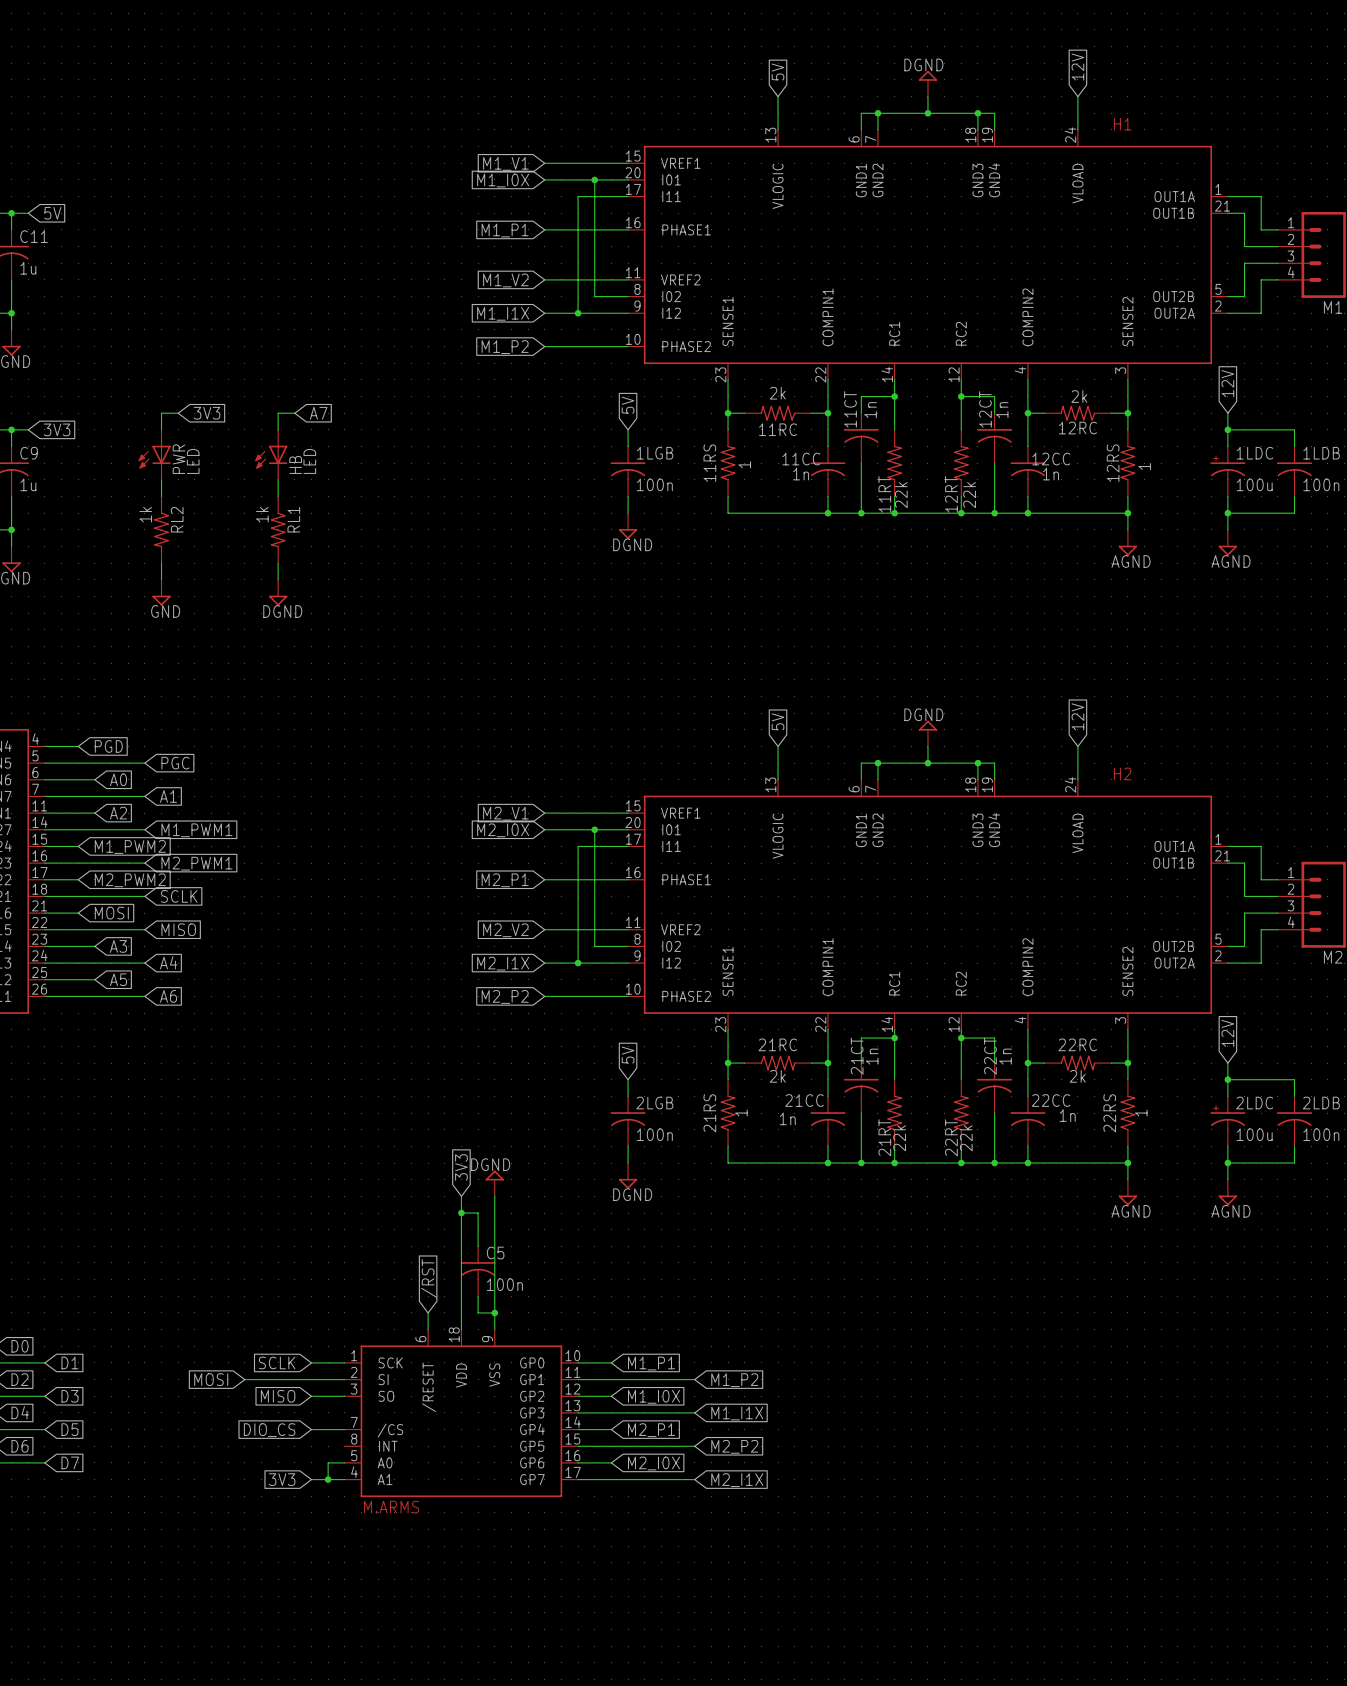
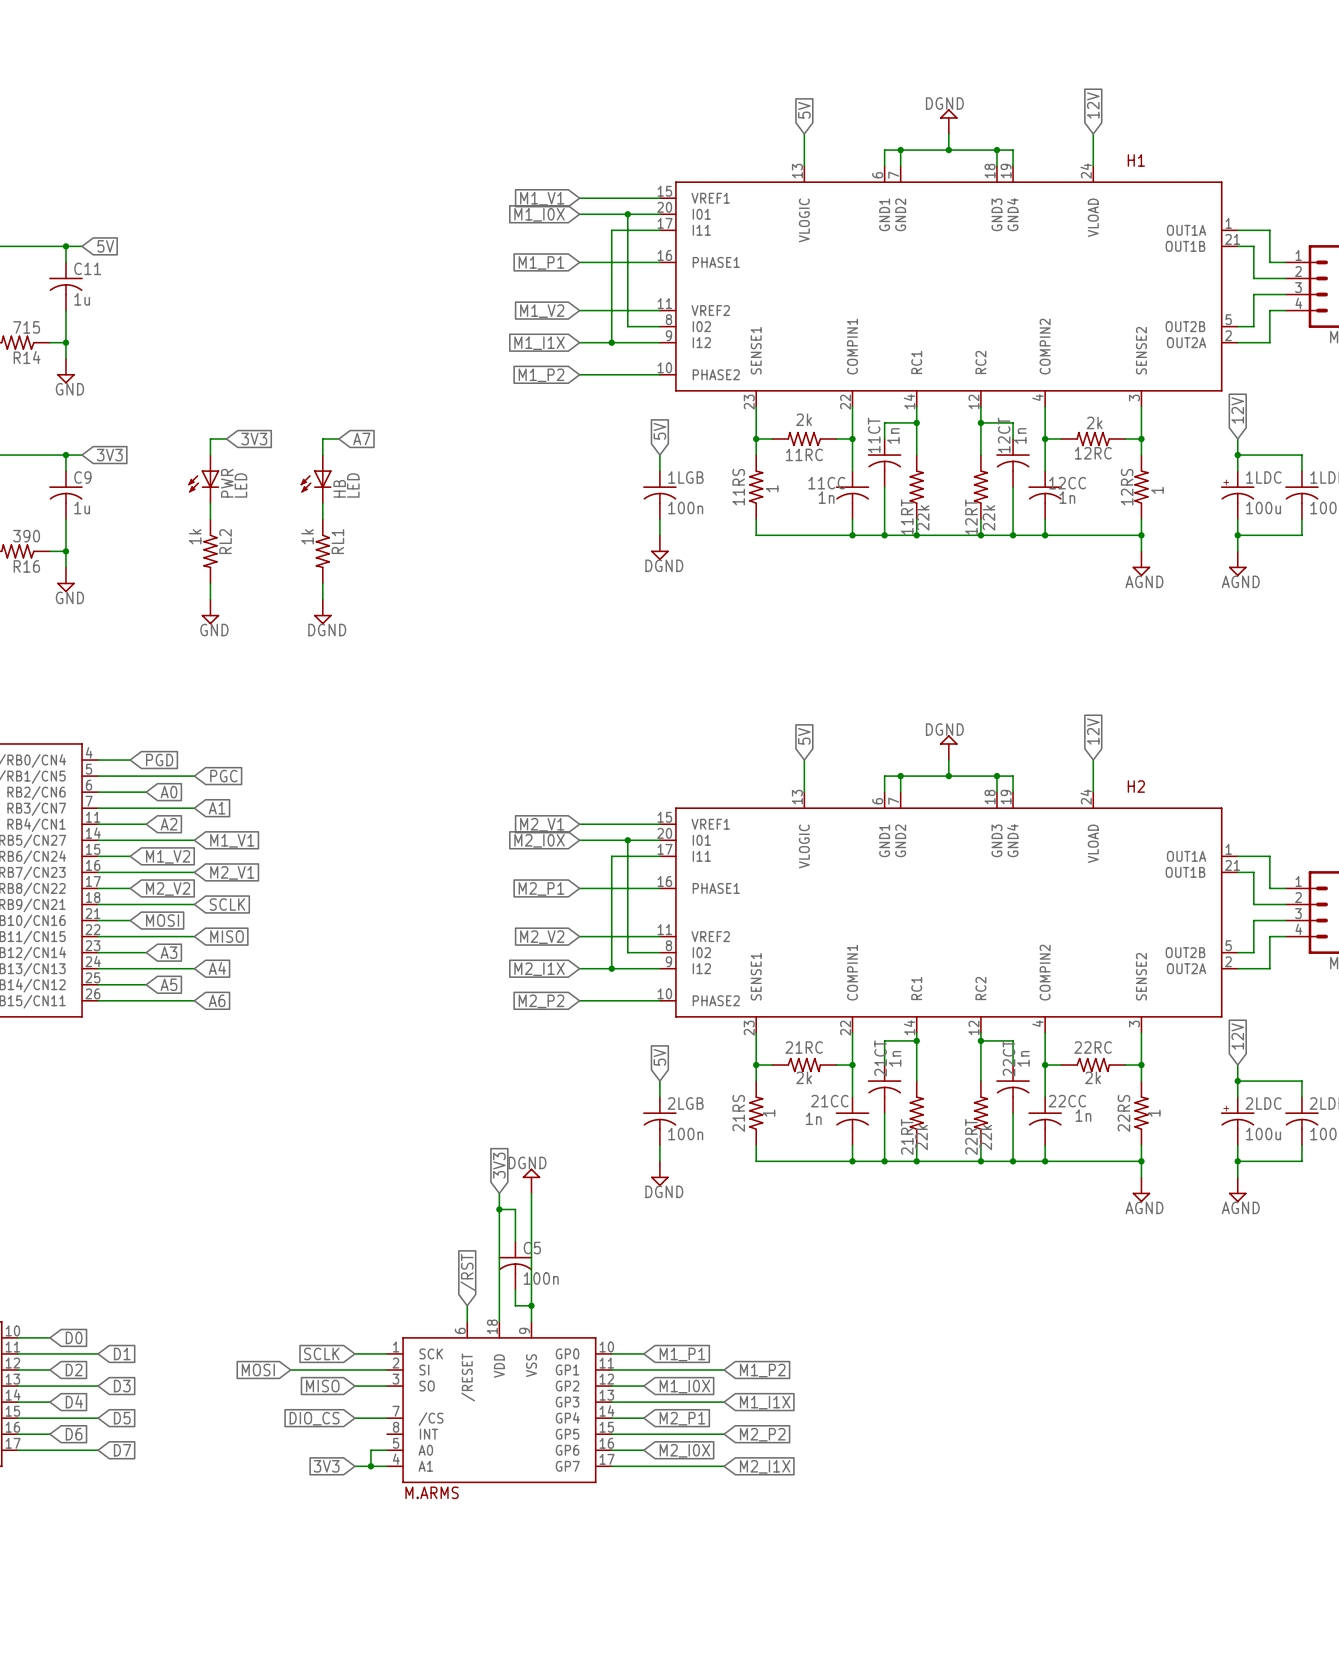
global label: M1_PWM1 (196, 830) -> M1_V1 (232, 840)
global label: M1_PWM2 (130, 846) -> M1_V2 (168, 856)
global label: M2_PWM1 (196, 863) -> M2_V1 (232, 872)
global label: M2_PWM2 (130, 880) -> M2_V2 (168, 888)

